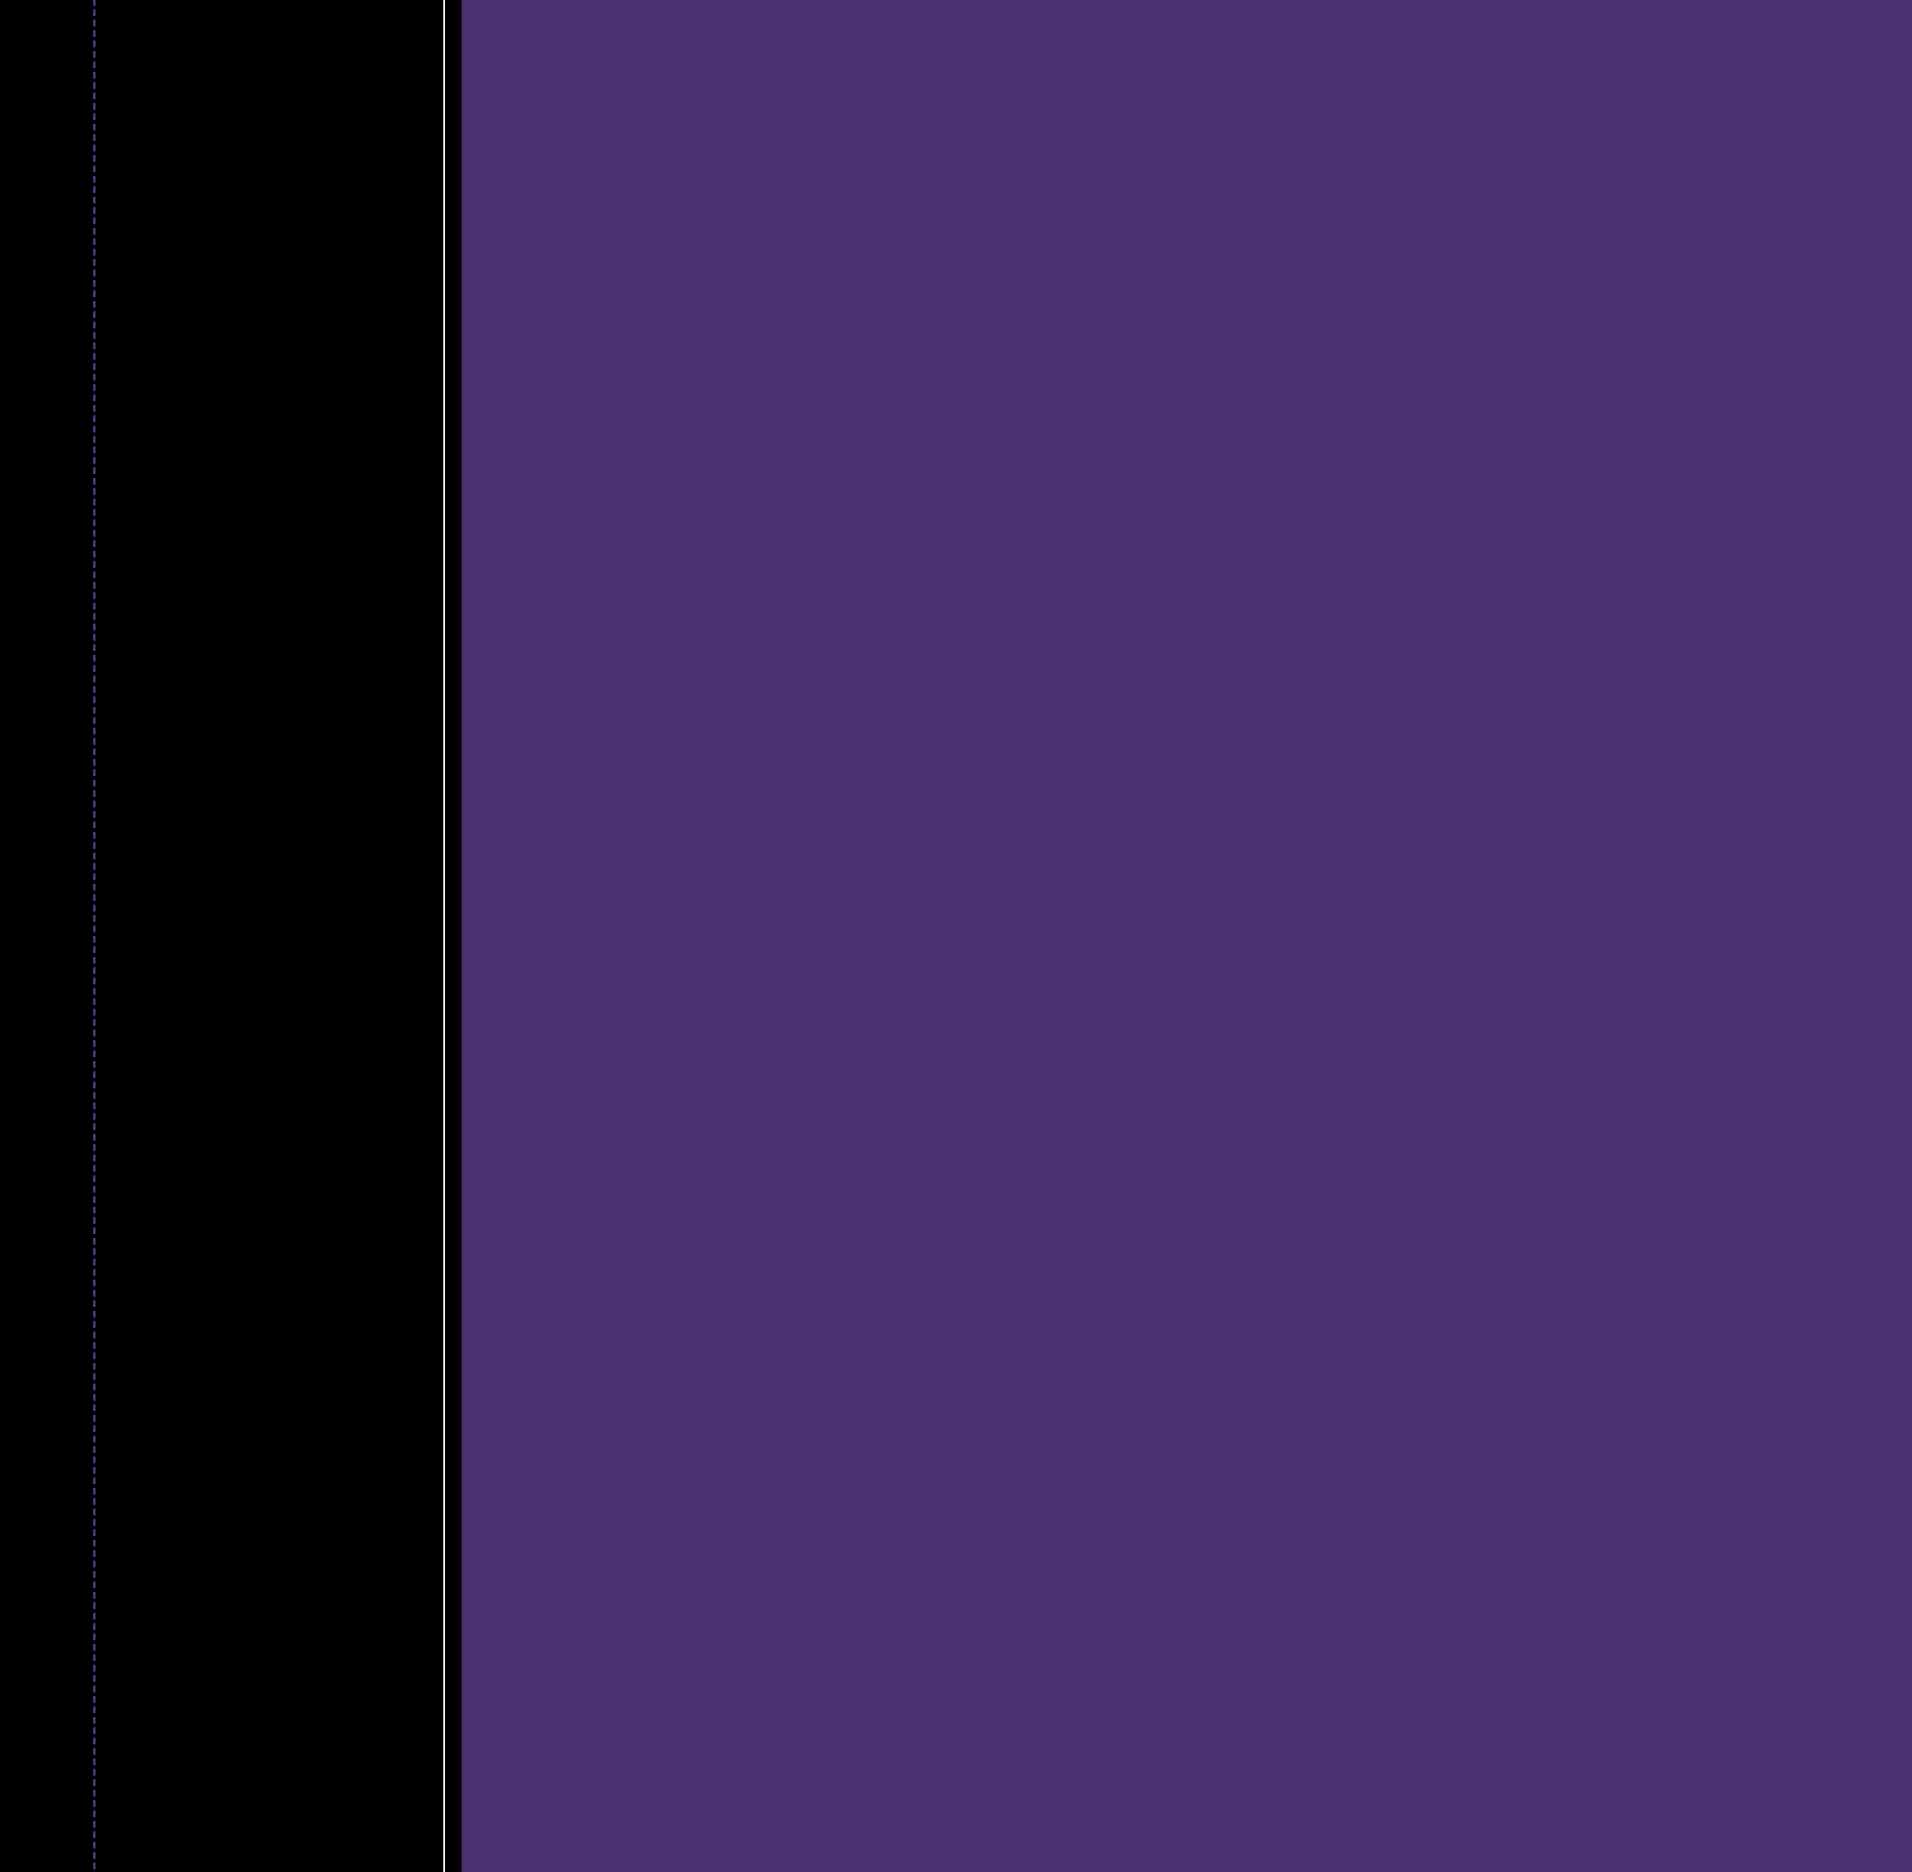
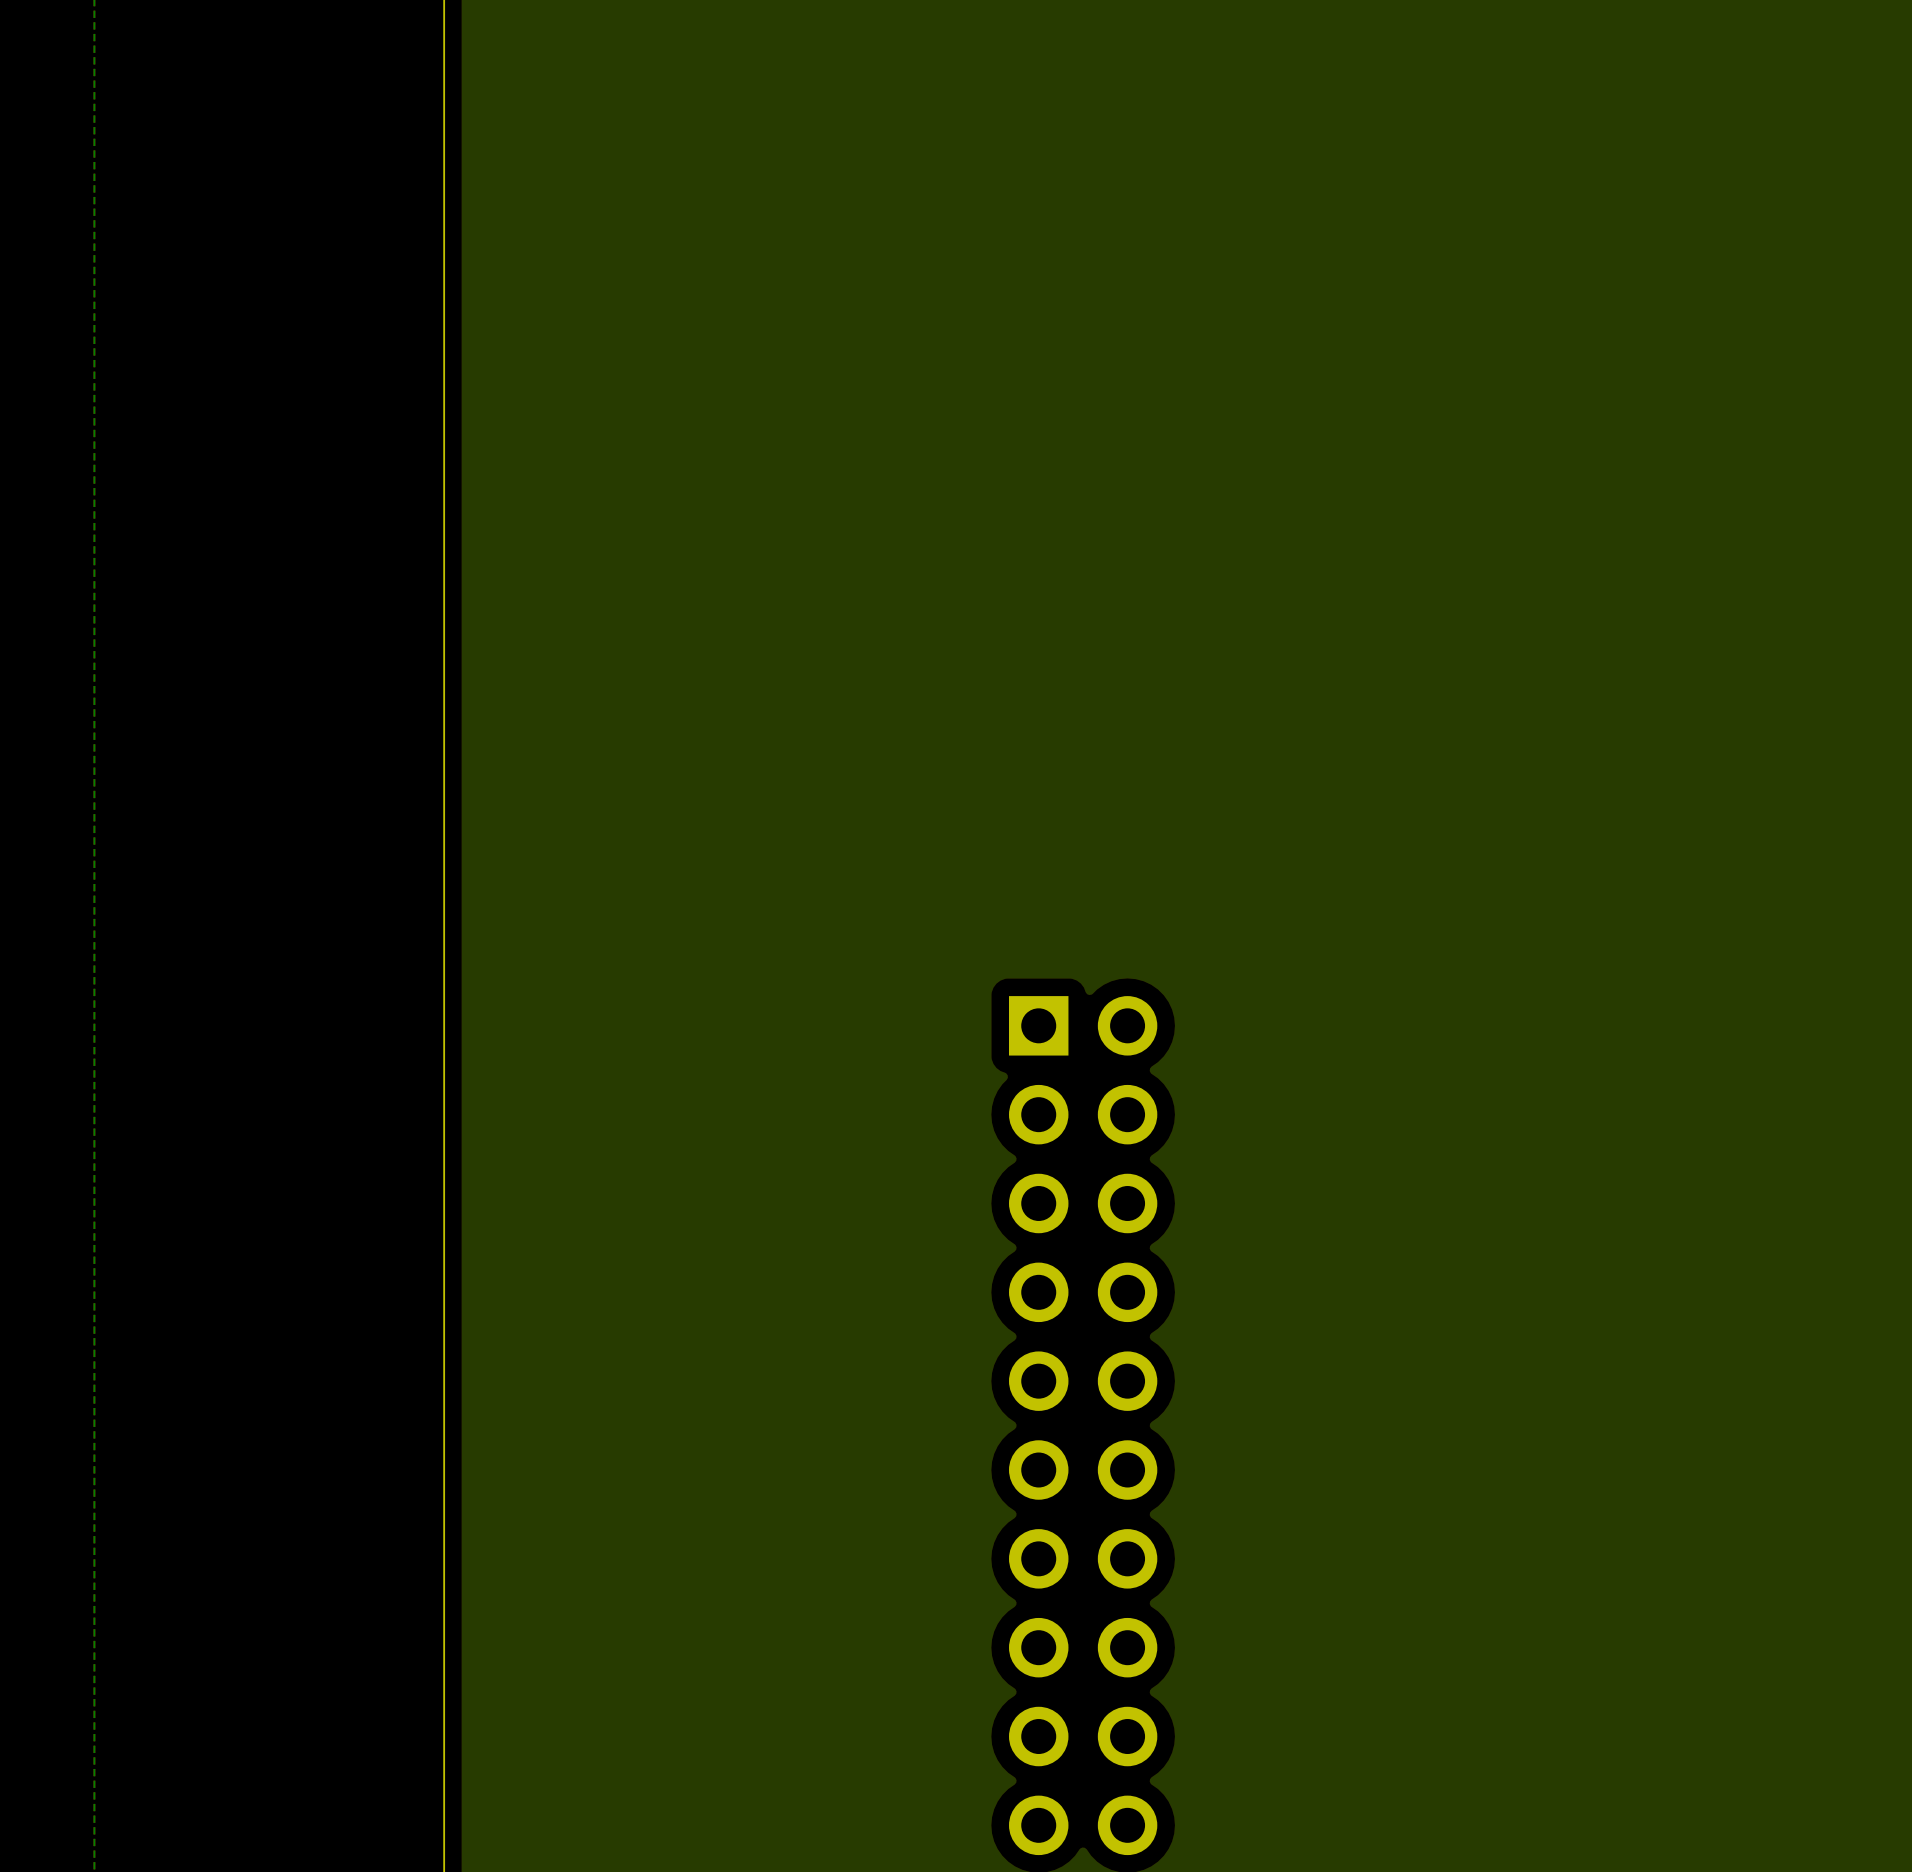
part: none -> (1083, 1425)

